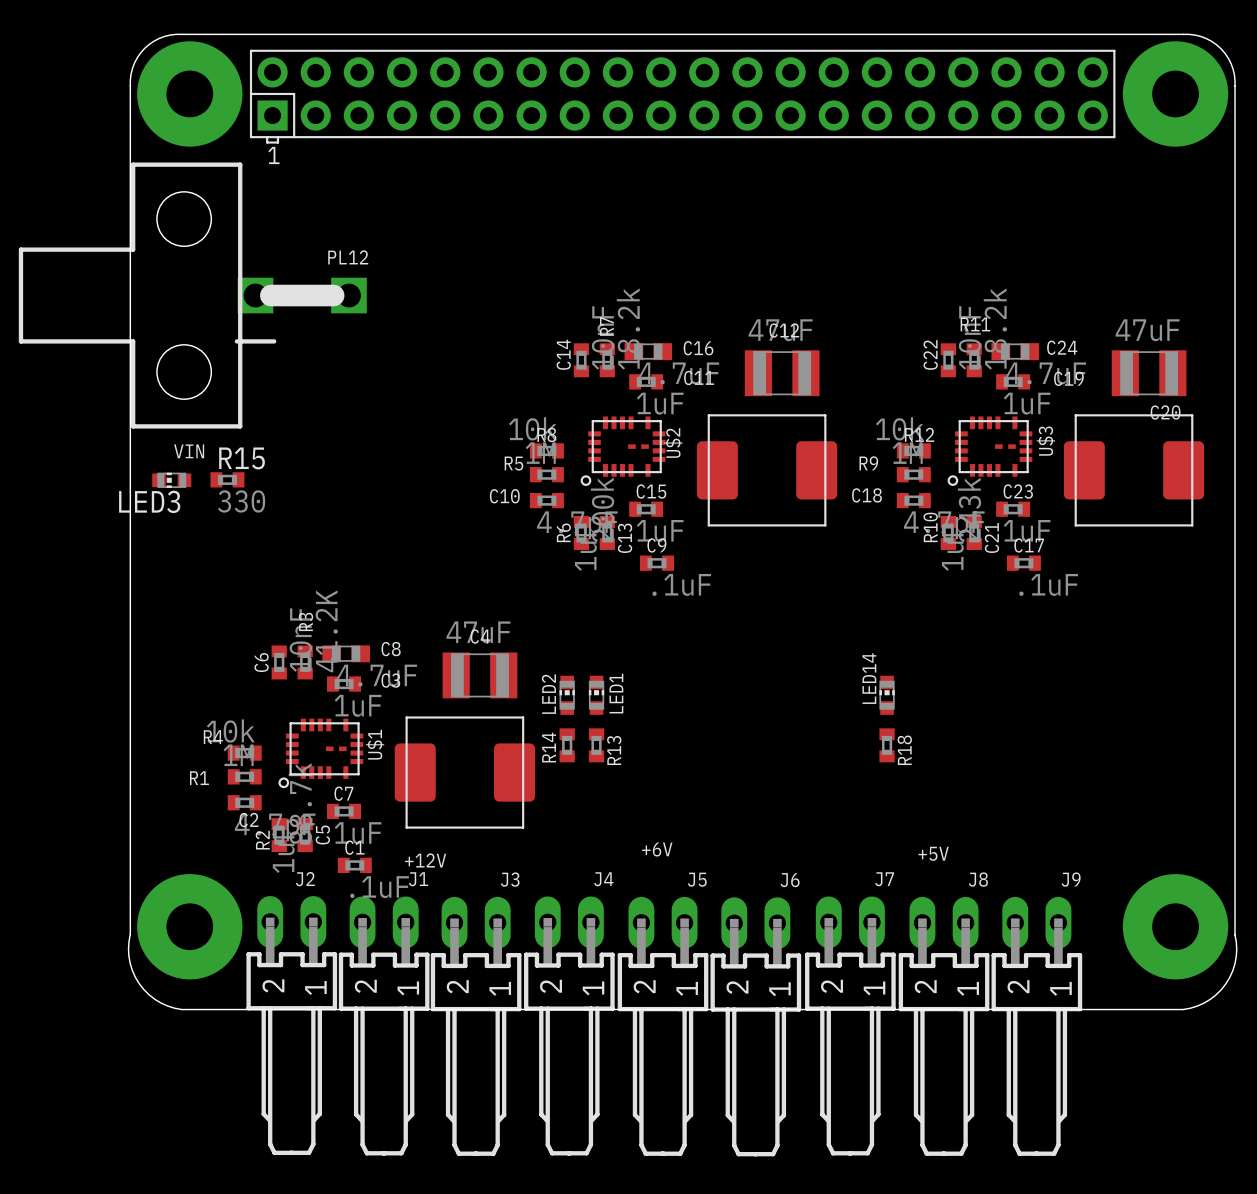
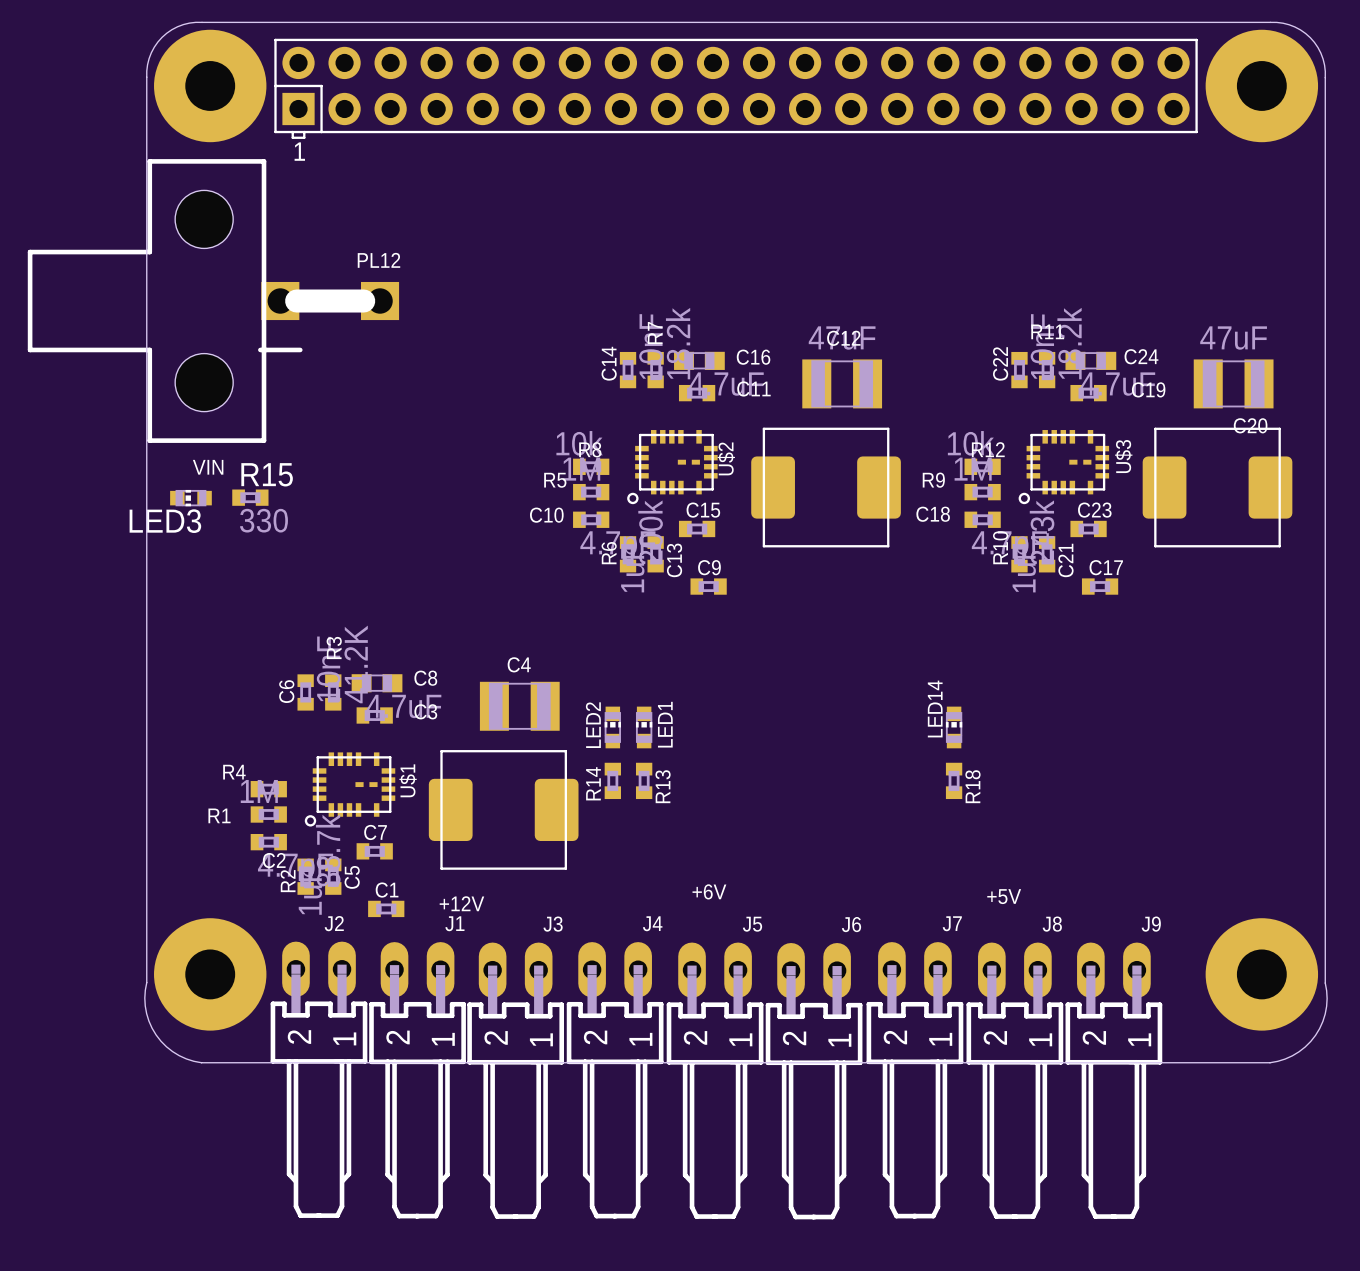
C11 value: 1uF (660, 403) -> none
C19 value: 1uF (1027, 403) -> none
C15 value: 1uF (660, 530) -> none
C23 value: 1uF (1027, 530) -> none
C9 value: .1uF (681, 584) -> none
C17 value: .1uF (1048, 584) -> none
C4 value: 47uF (478, 632) -> none
C3 value: 1uF (358, 705) -> none
R4 value: 10k (230, 731) -> none
C7 value: 1uF (358, 833) -> none
C1 value: .1uF (379, 887) -> none

